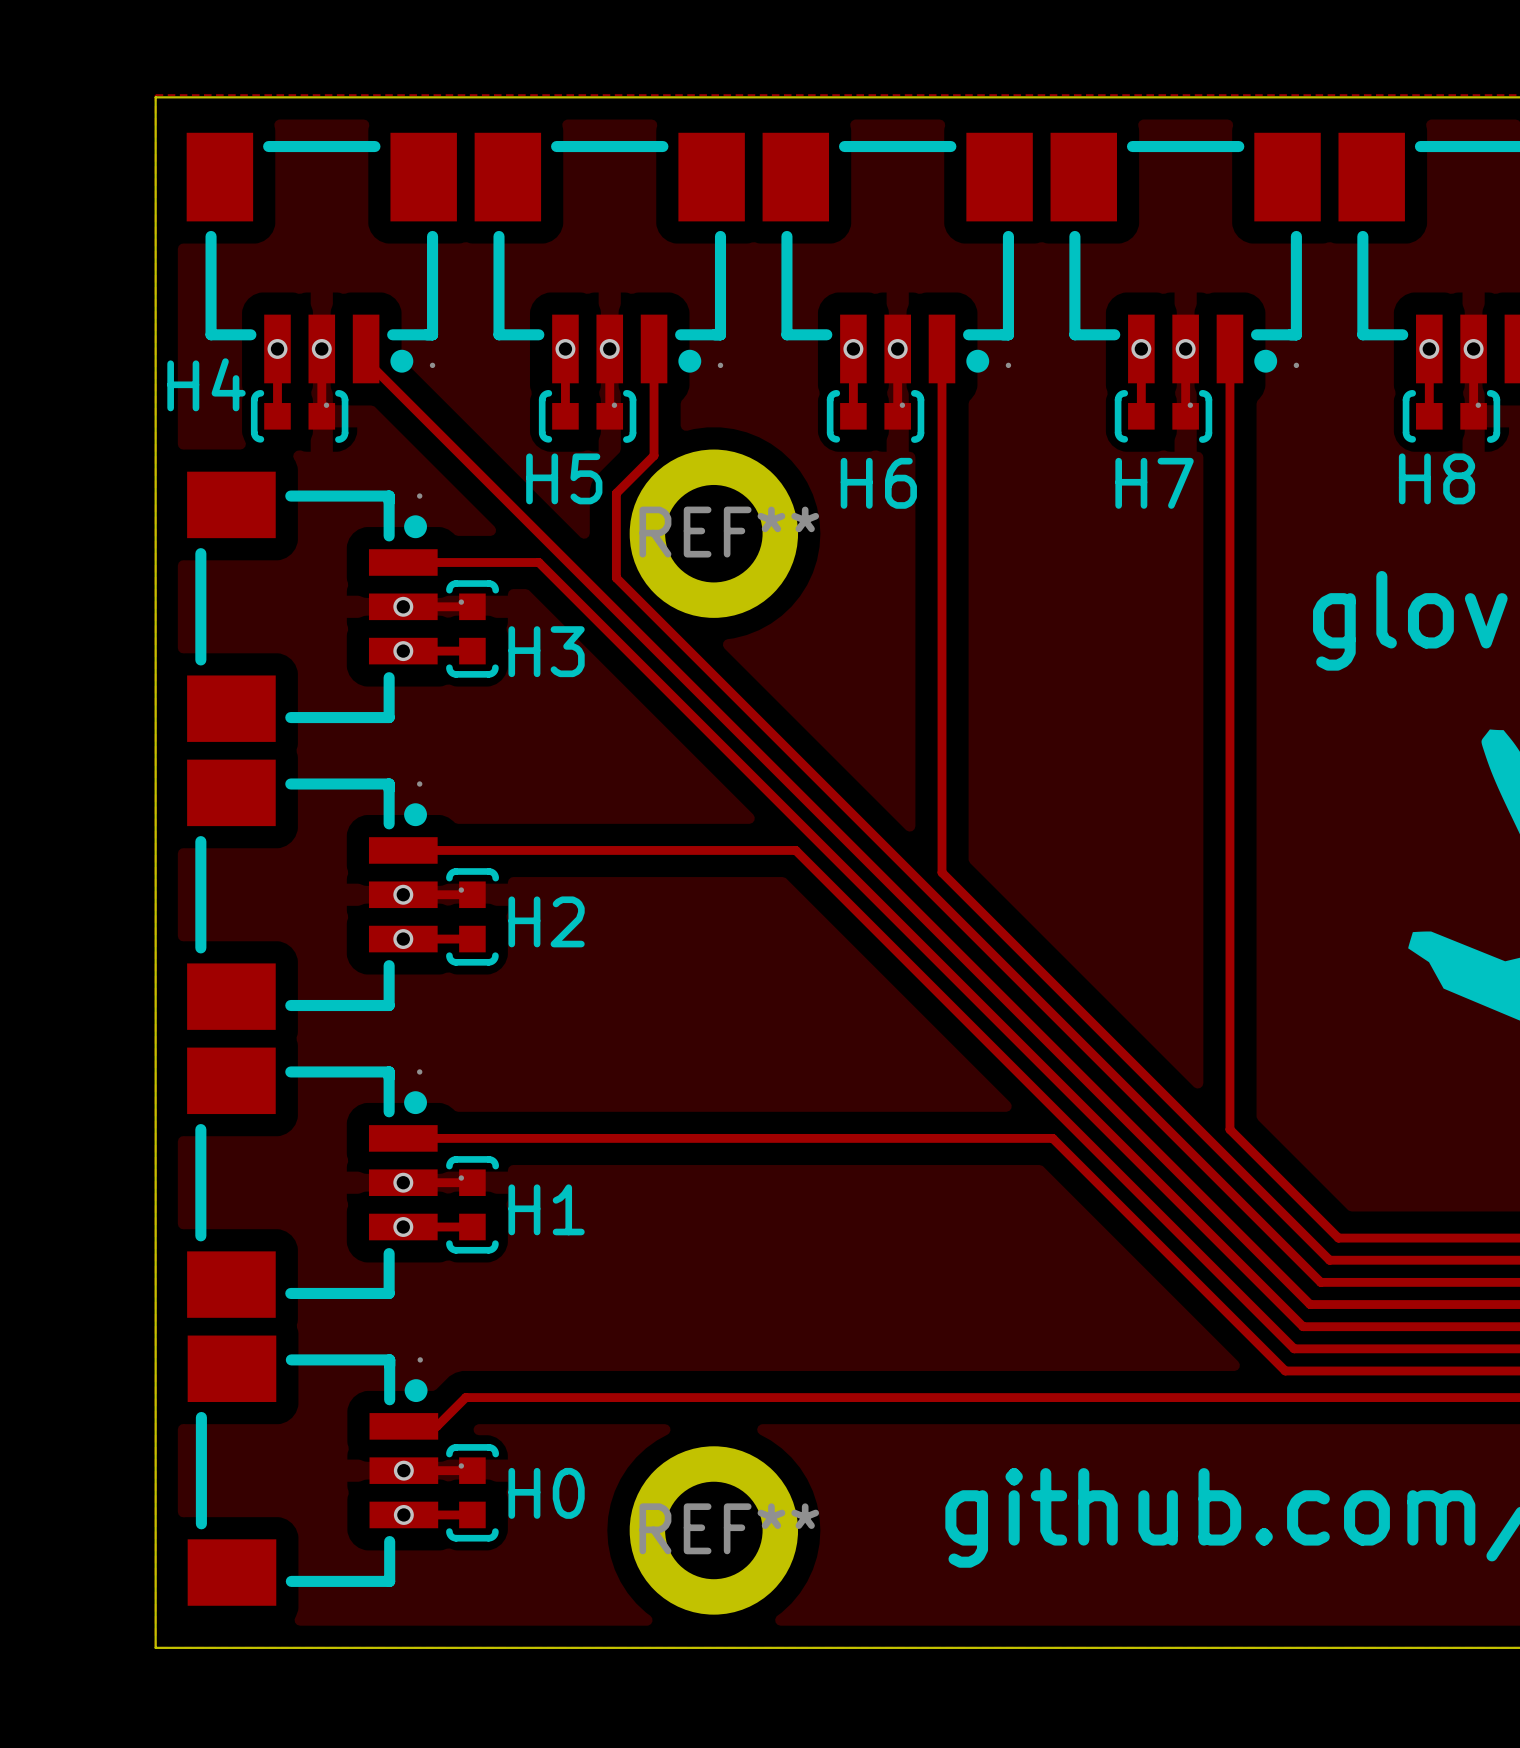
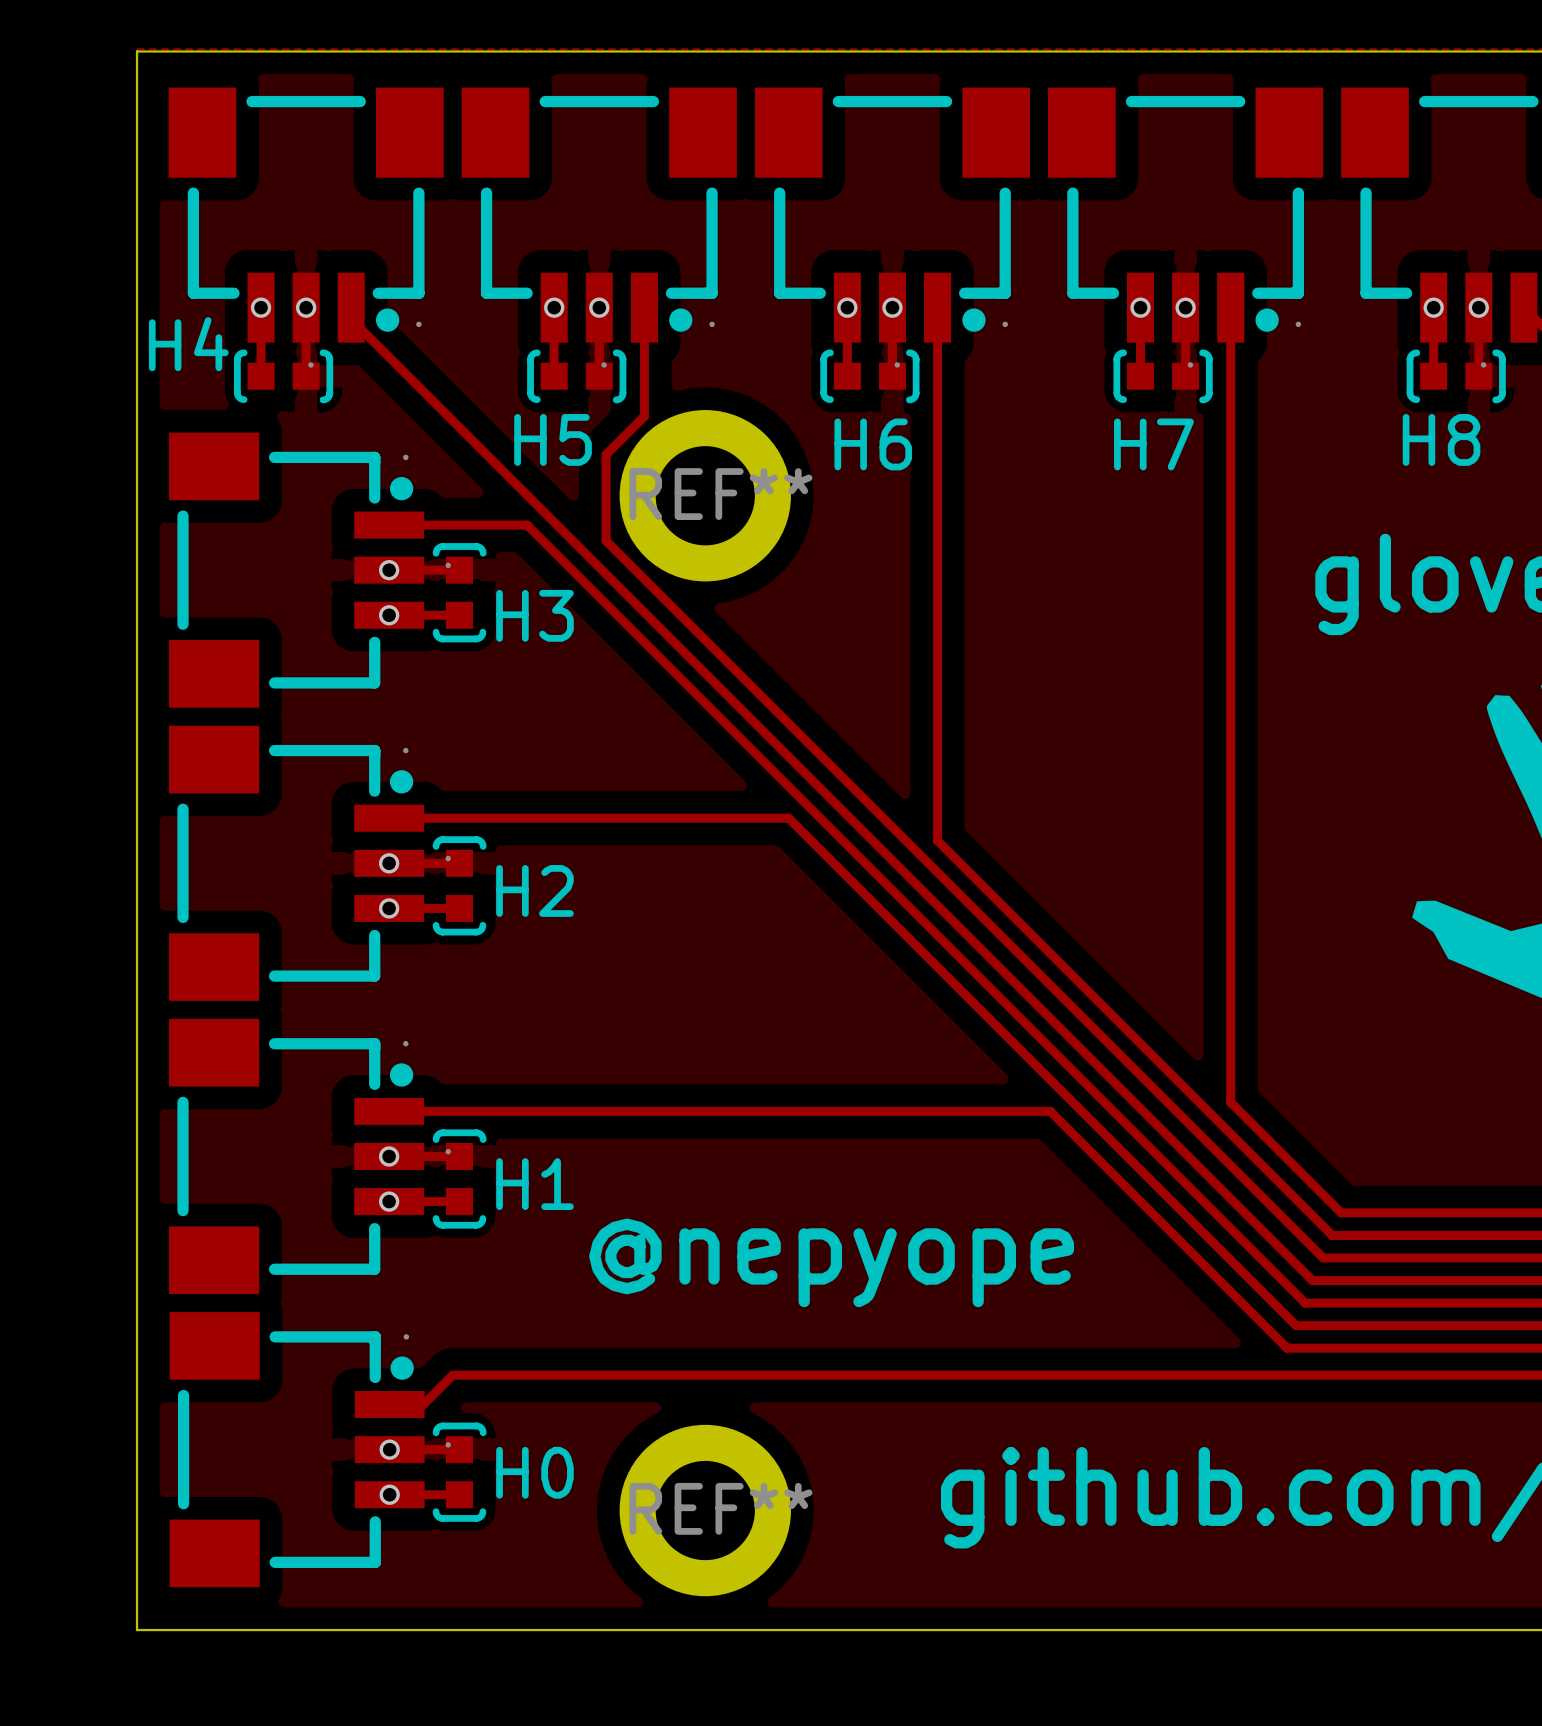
text: none -> @nepyope (831, 1262)

